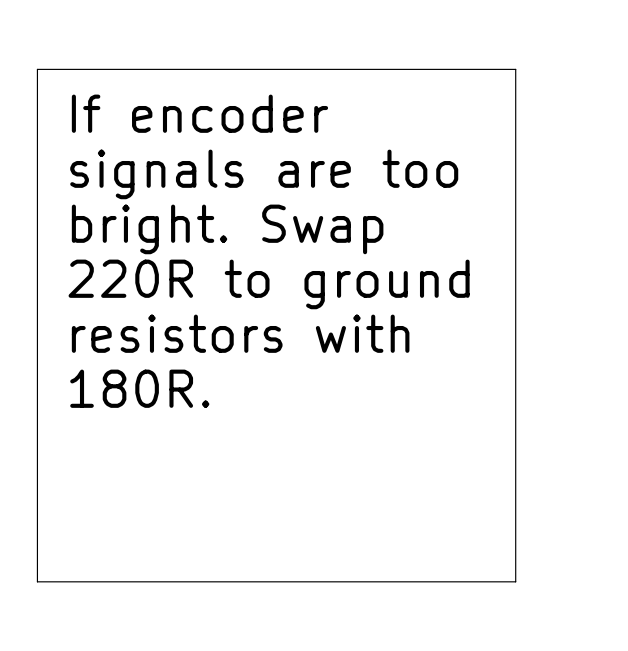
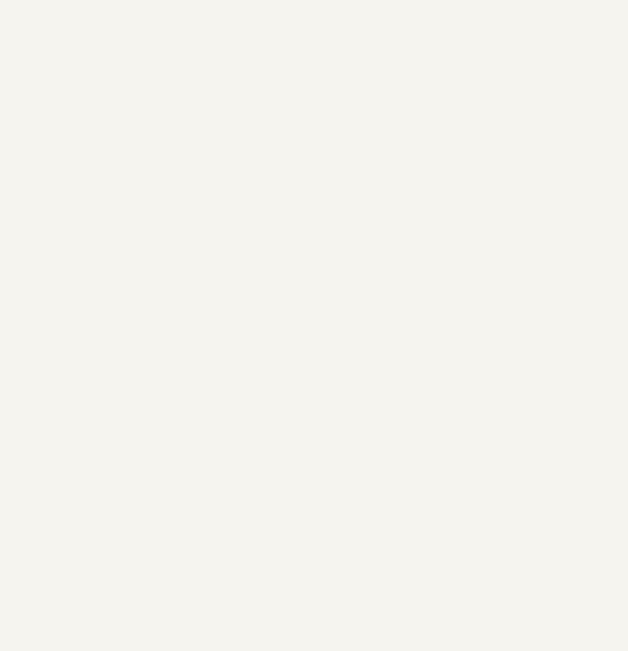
line: (37, 69) (515, 69) (515, 581) (37, 581) (37, 69) -> none
text: If encoder (199, 113) -> none
text: signals are too (264, 174) -> none
text: bright. Swap (227, 229) -> none
text: 220R to ground (269, 284) -> none
text: resistors with (240, 333) -> none
text: 180R. (139, 388) -> none

